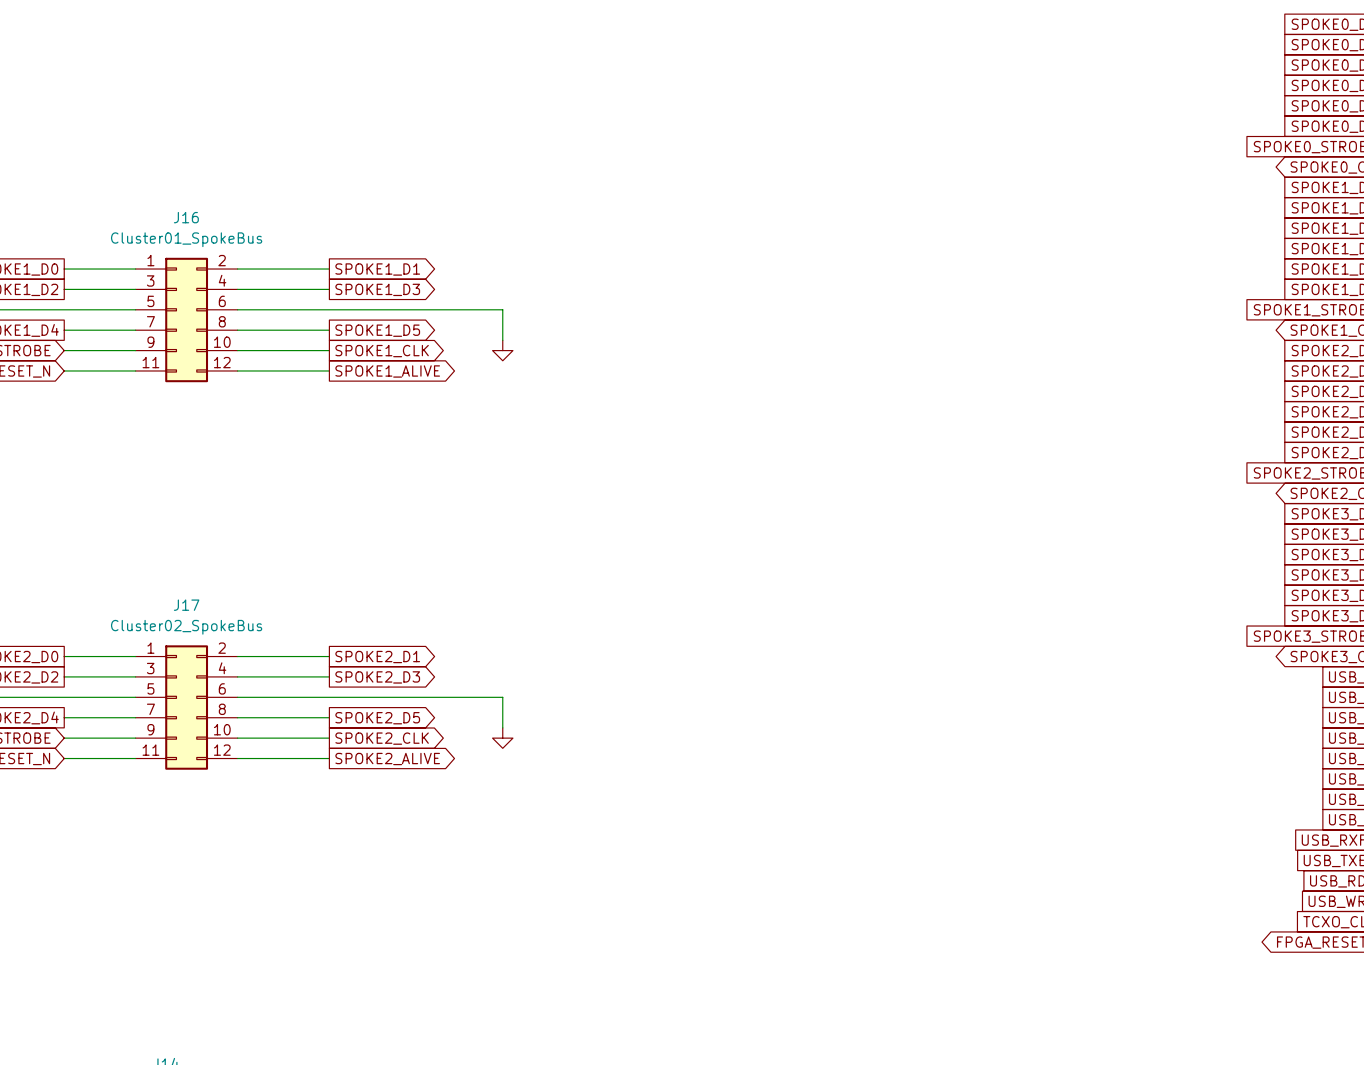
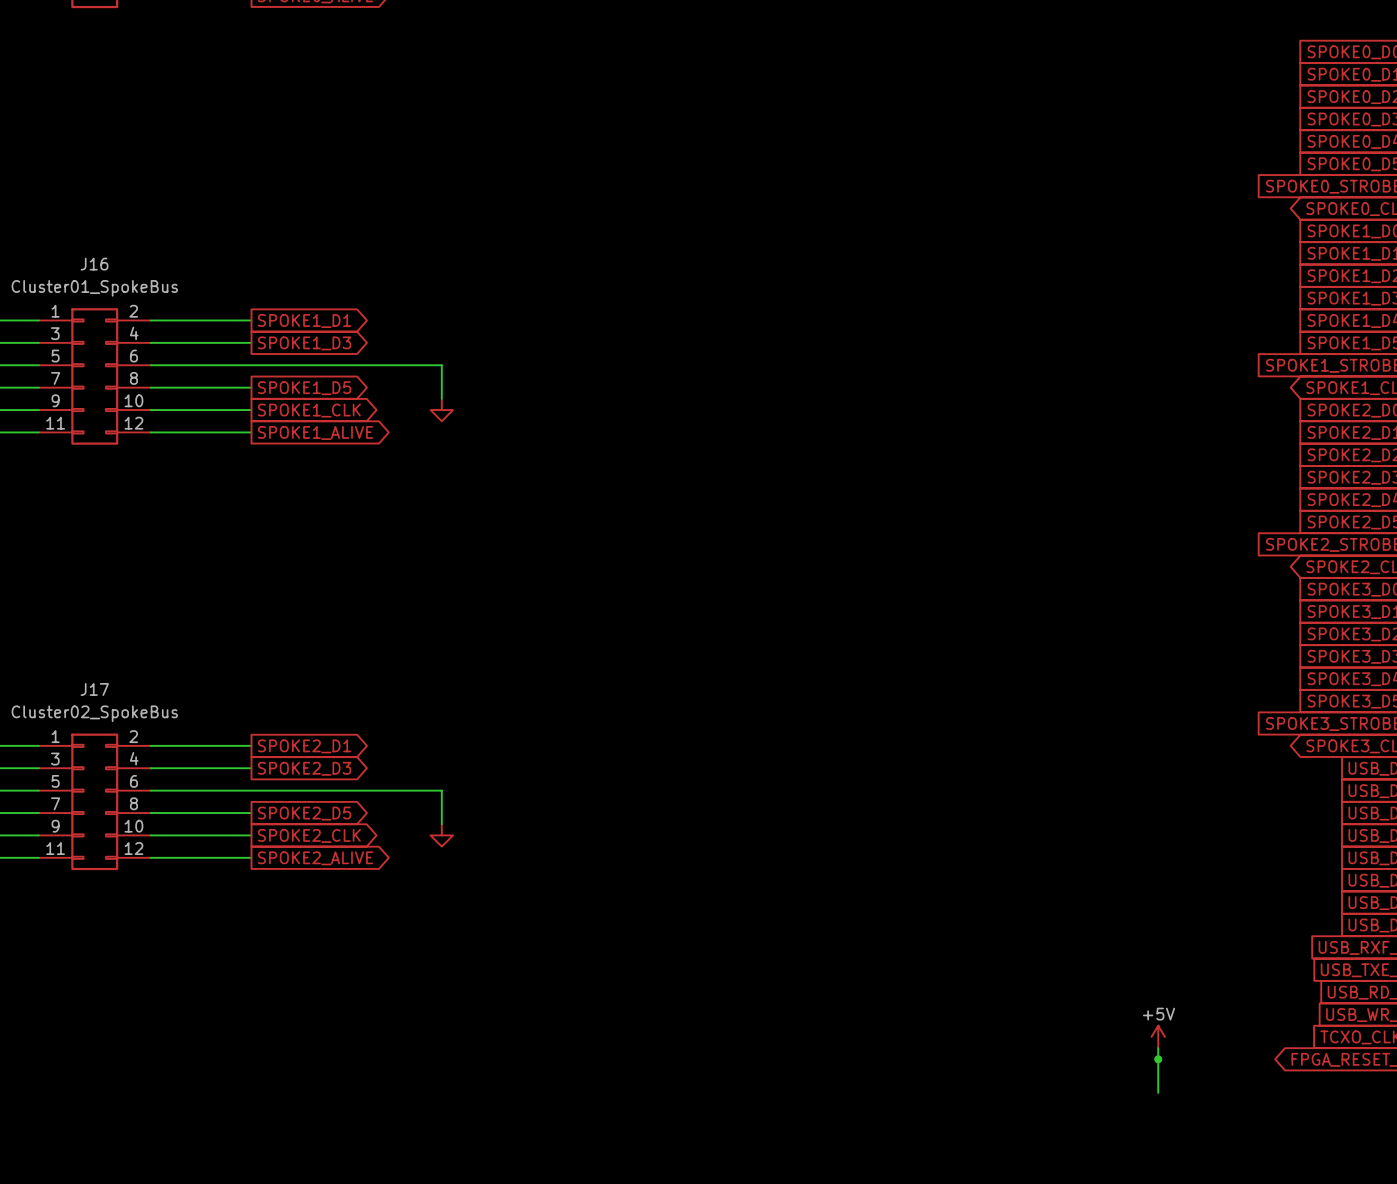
power symbol: none -> +5V (1158, 1036)
wire: none -> (1158, 1048) (1158, 1092)
junction: none -> (1158, 1059)

